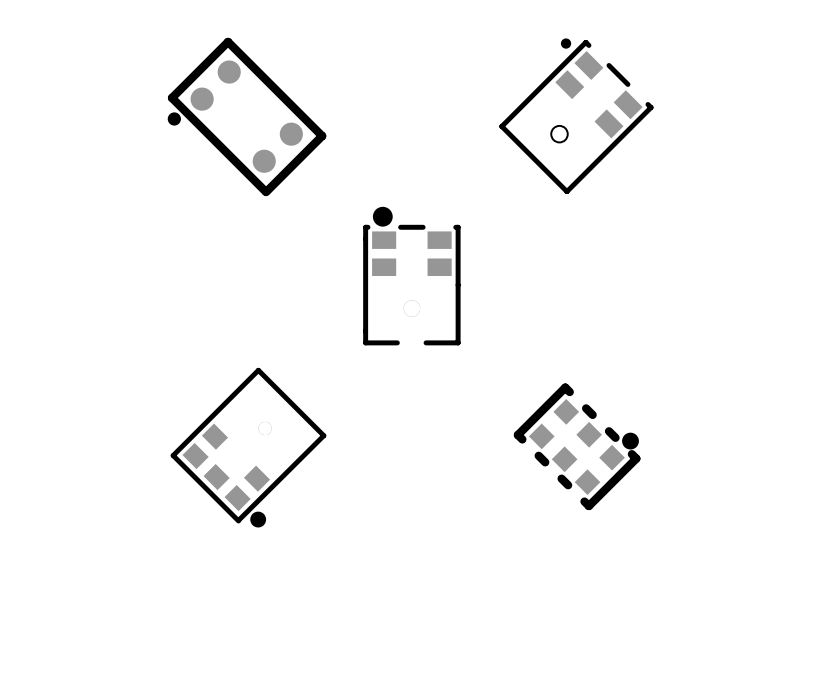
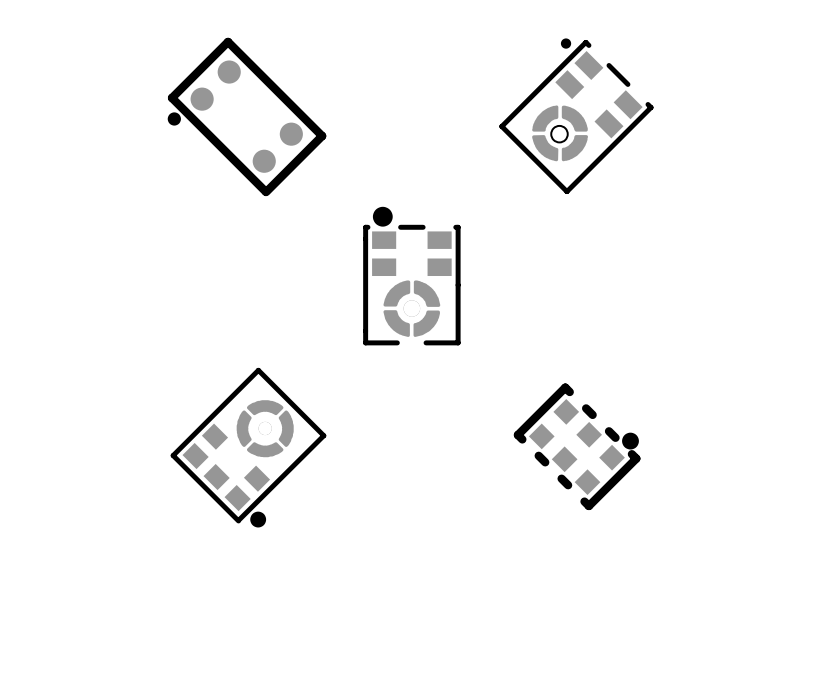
part footprint: [499, 38, 654, 195] -> [499, 38, 654, 195]
part footprint: [363, 206, 461, 346] -> [363, 206, 461, 346]
part footprint: [170, 367, 327, 528] -> [170, 367, 327, 528]

